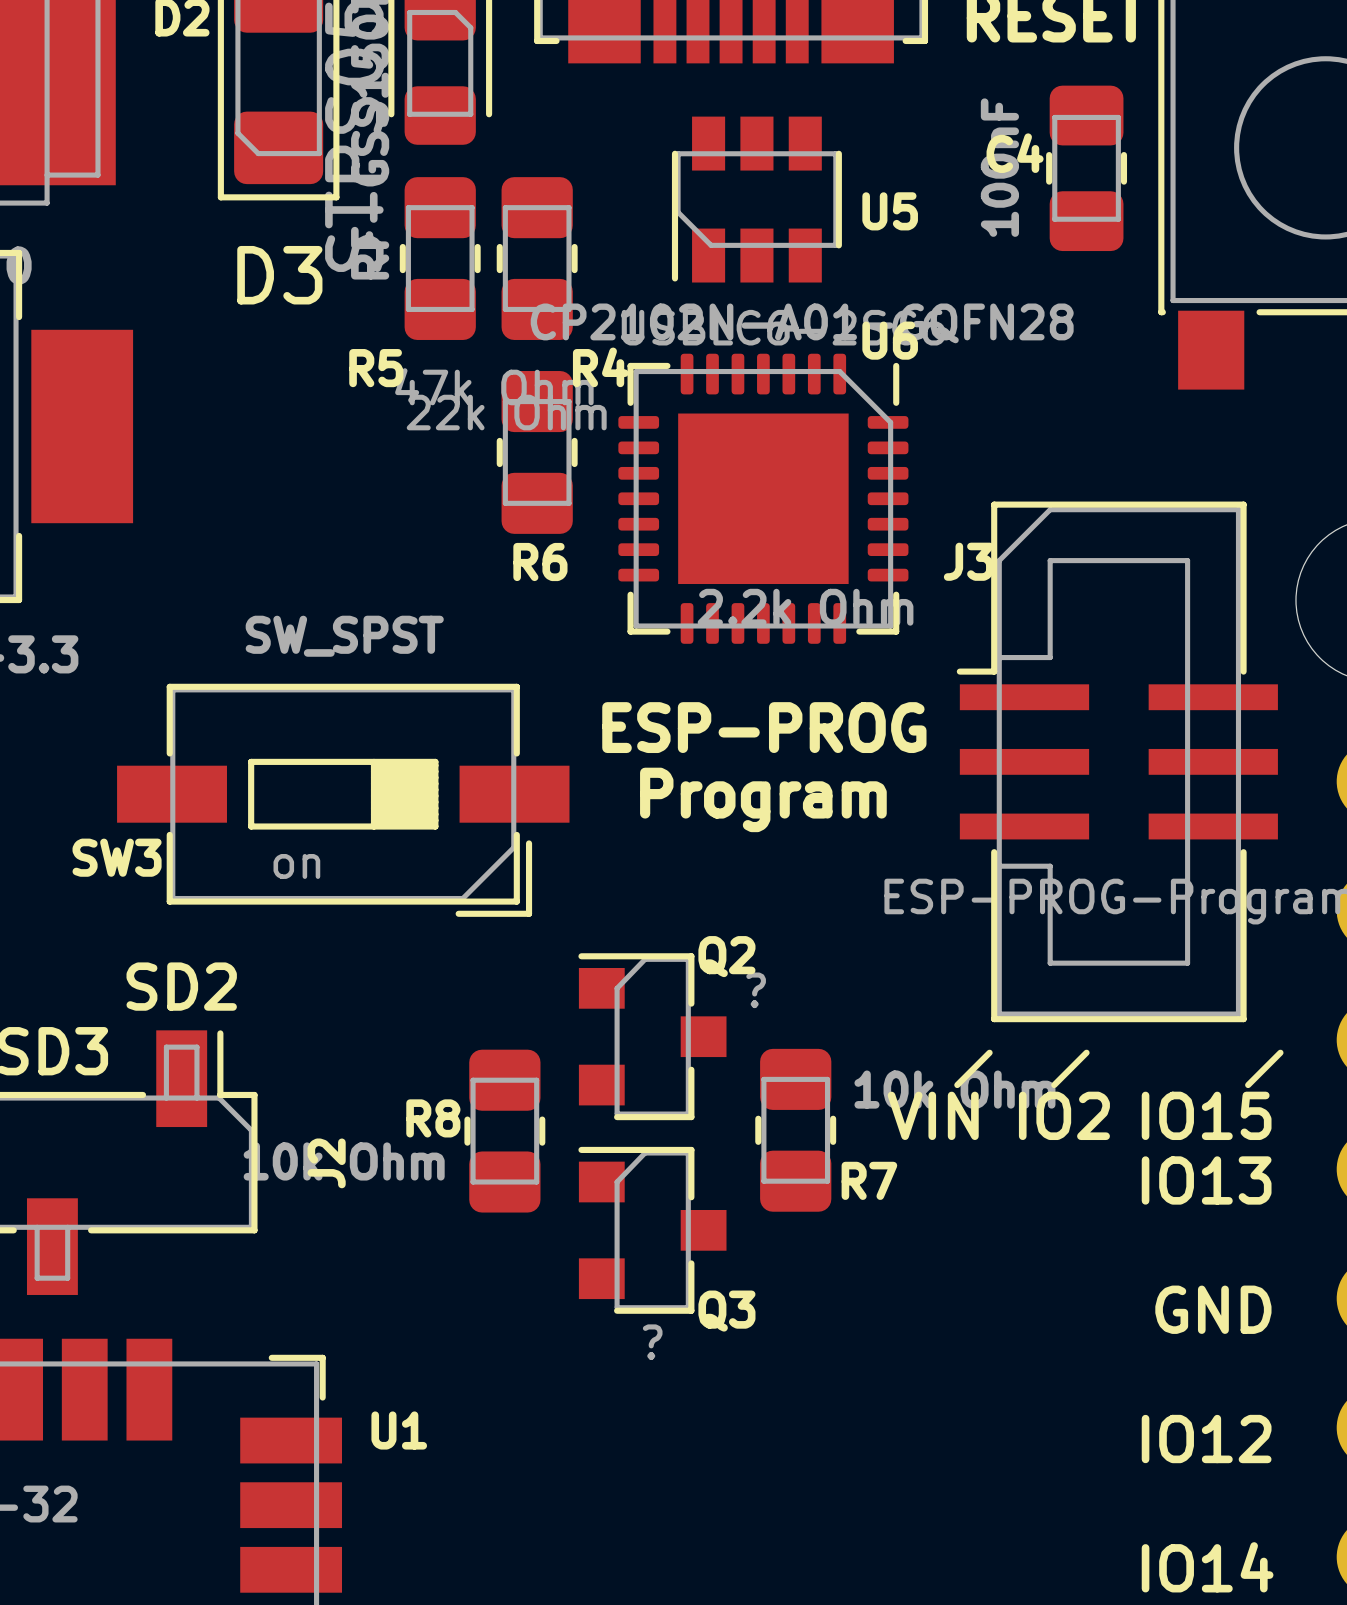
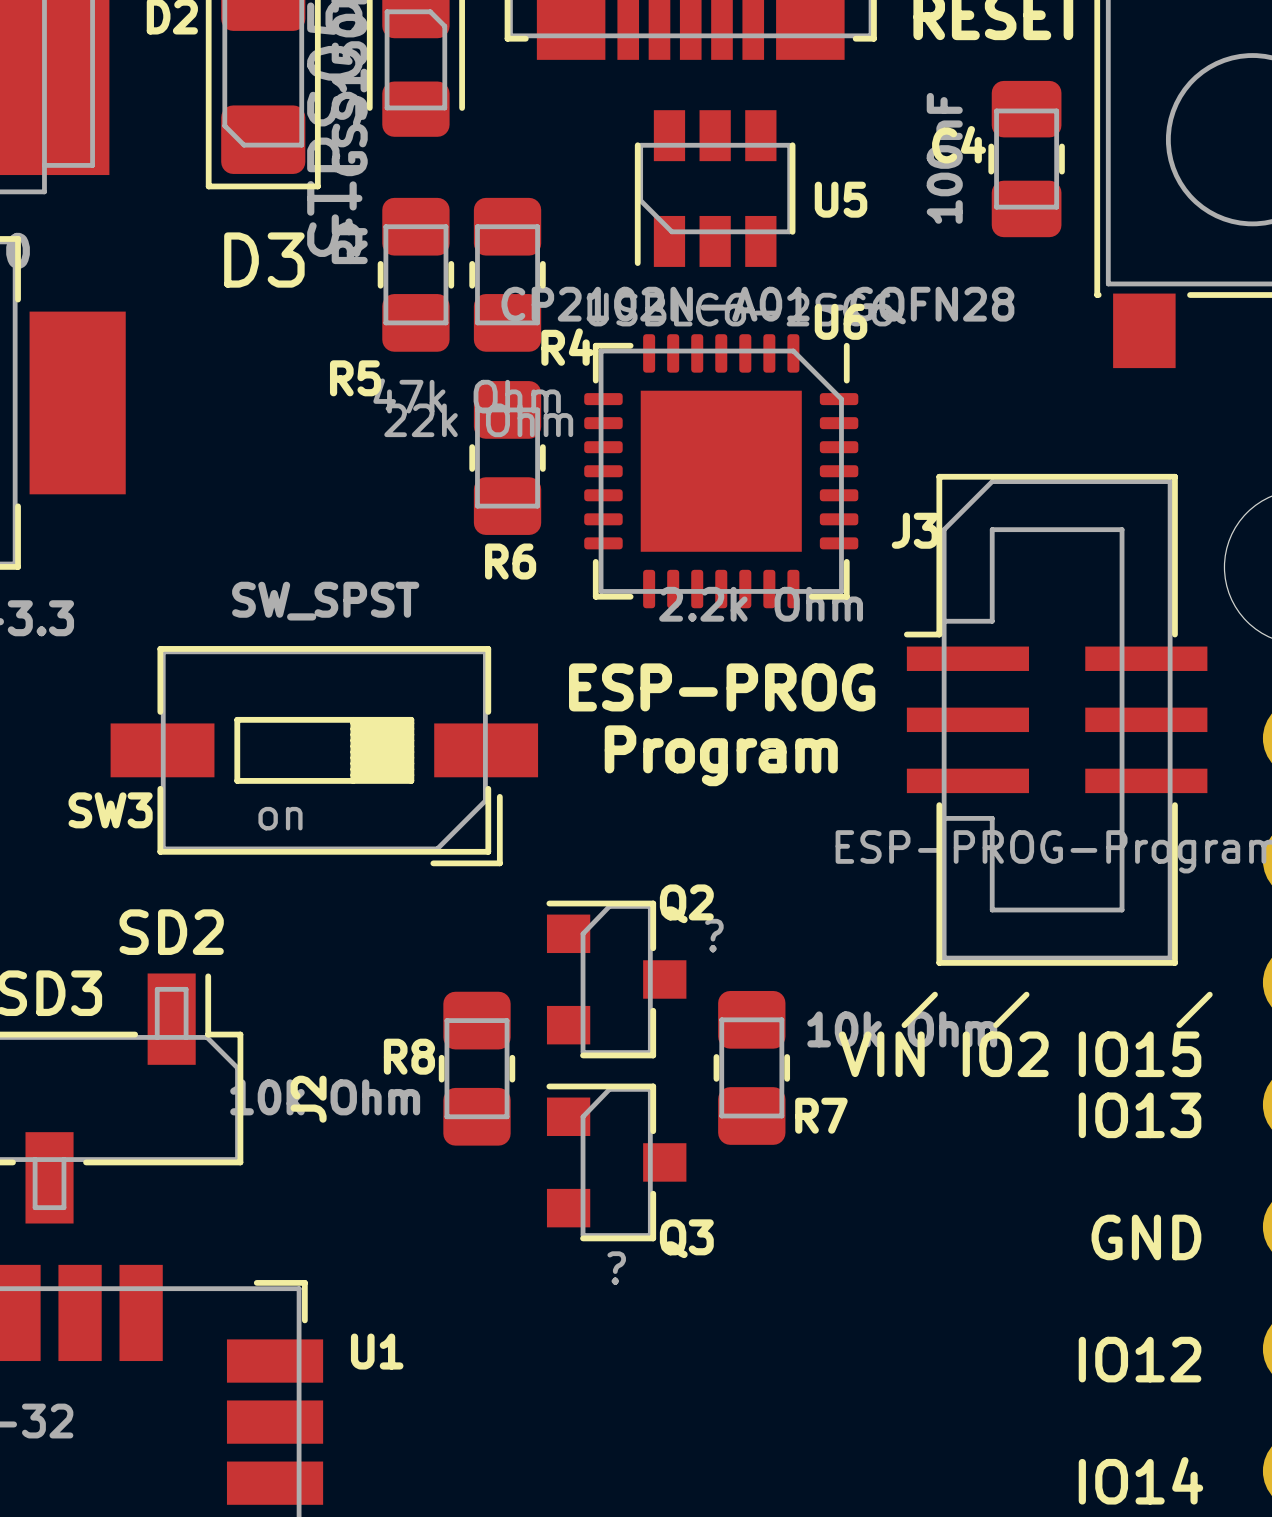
R5 position: (440, 258) -> (415, 274)
R4 position: (537, 258) -> (507, 274)
R6 position: (537, 452) -> (507, 458)

